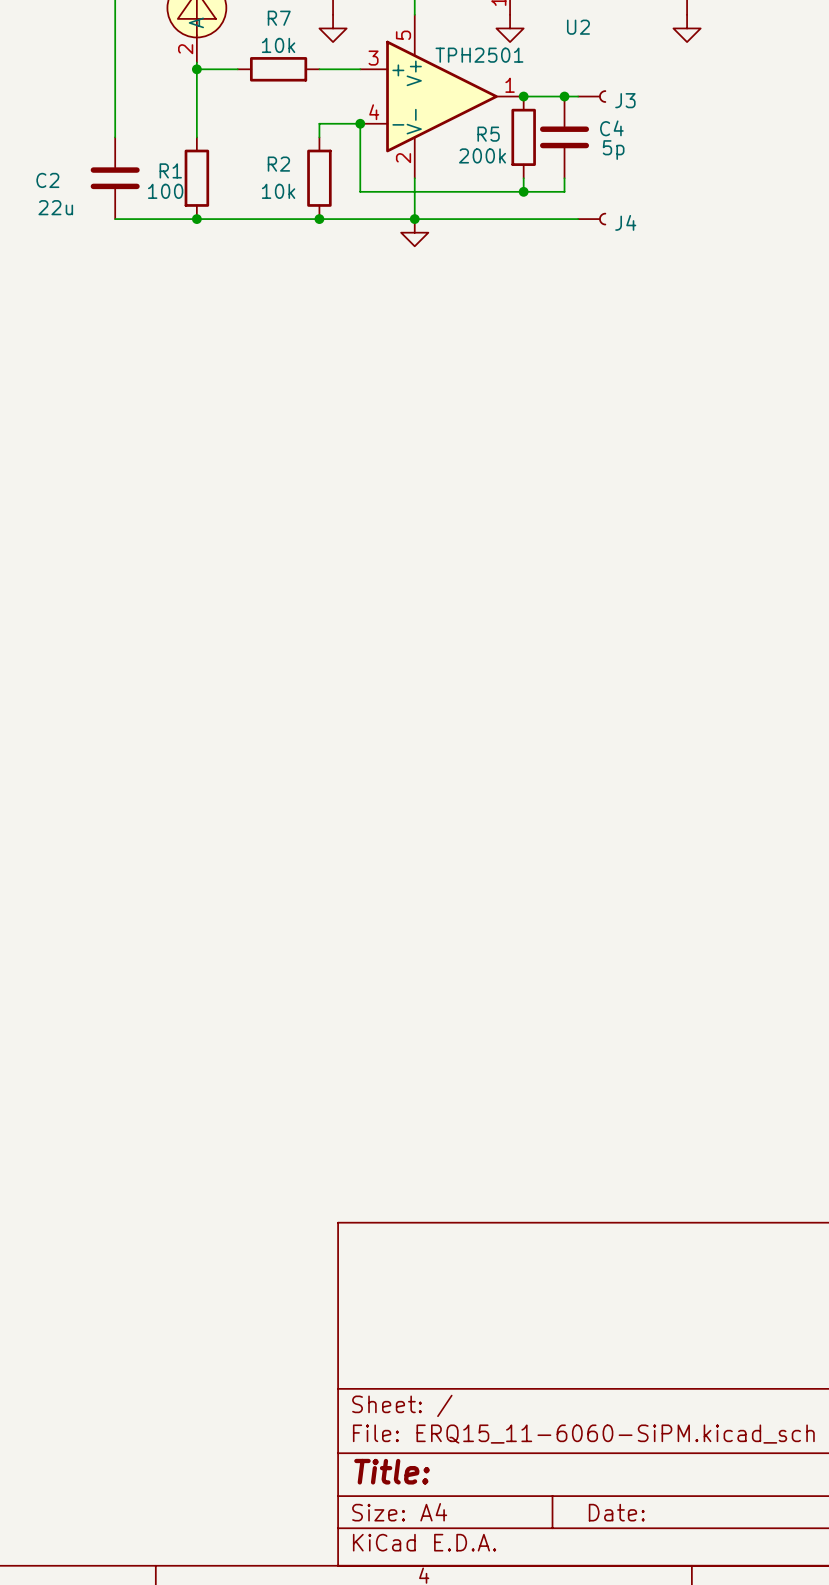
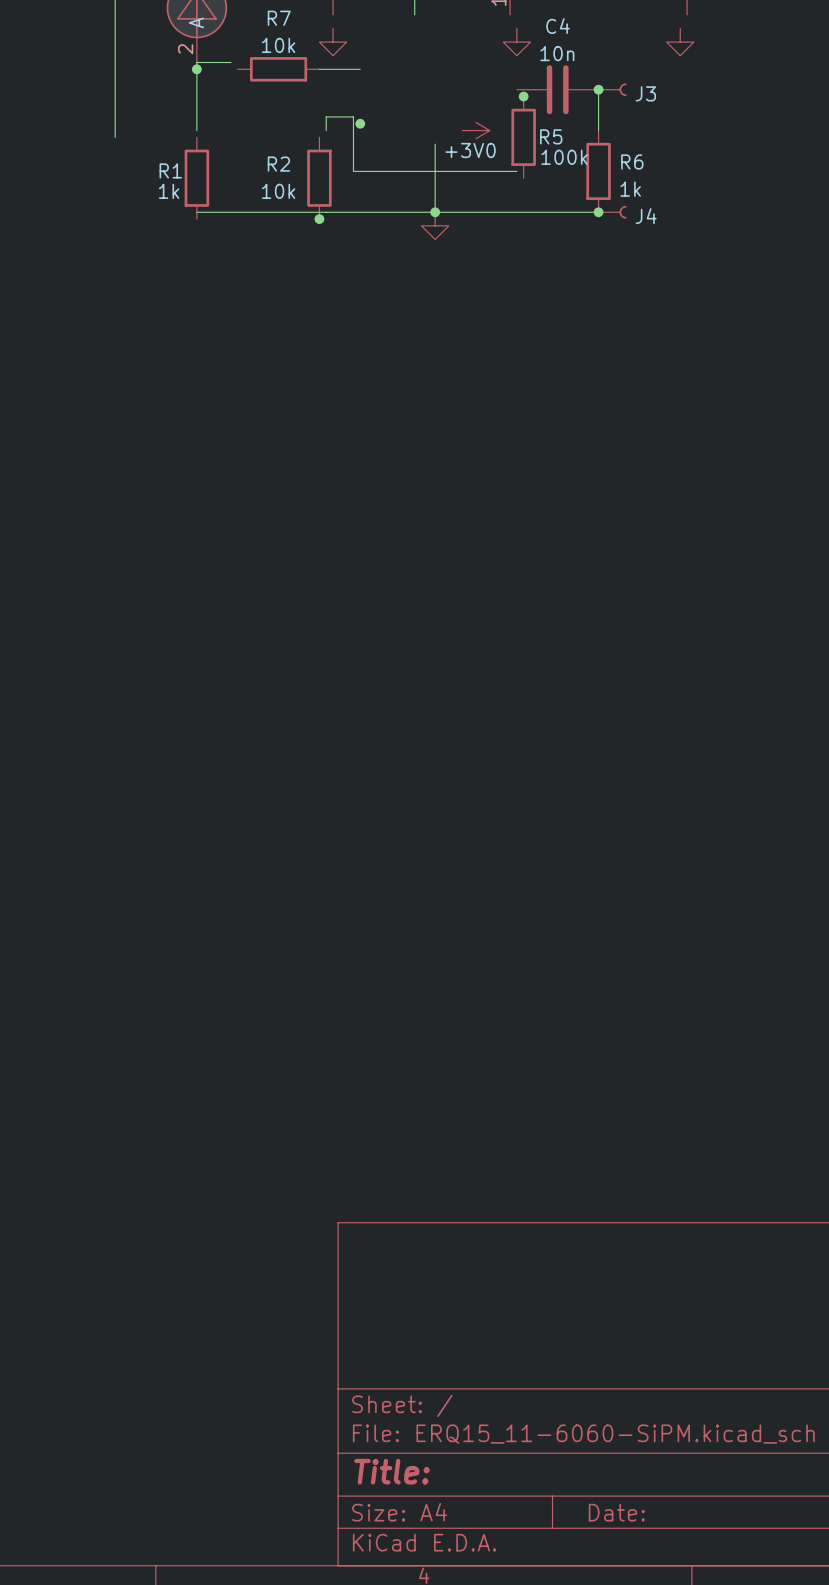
power symbol position: (333, 28) -> (333, 42)
power symbol position: (510, 28) -> (516, 42)
power symbol position: (687, 28) -> (680, 42)
wire: none -> (196, 62) (230, 62)
wire: (196, 69) (237, 69) -> none
U2: TPH2501 (441, 96) -> none
wire: (523, 96) (578, 96) -> none
junction position: (564, 96) -> (598, 89)
J3 position: (592, 96) -> (612, 89)
C4 name position: C4 (611, 128) -> C4 (558, 26)
wire: (196, 130) (196, 137) -> none
wire: none -> (326, 130) (326, 116) (353, 116) (353, 171) (516, 171)
power symbol: none -> +3V0 (476, 130)
R5 name position: R5 (488, 134) -> R5 (551, 136)
wire: (319, 137) (319, 123) (360, 123) (360, 191) (564, 191) (564, 178) -> none
C4 rotation: 0° (564, 137) -> 90° clockwise (557, 89)
wire: none -> (435, 144) (435, 212)
C4 value: 5p (613, 150) -> 10n (557, 53)
R5 value: 200k (482, 155) -> 100k (564, 157)
R6: none -> 1k (598, 171)
C2: 22u (115, 178) -> none
wire: (414, 178) (414, 219) -> (598, 89) (598, 130)
wire: (523, 178) (523, 191) -> none
R1 value: 100 (165, 191) -> 1k (169, 191)
junction: (523, 191) -> none
wire: none -> (196, 212) (598, 212)
junction: none -> (598, 212)
wire: (115, 219) (578, 219) -> none
junction: (196, 219) -> none
junction position: (414, 219) -> (435, 212)
J4 position: (592, 219) -> (612, 212)
power symbol position: (414, 232) -> (435, 225)

